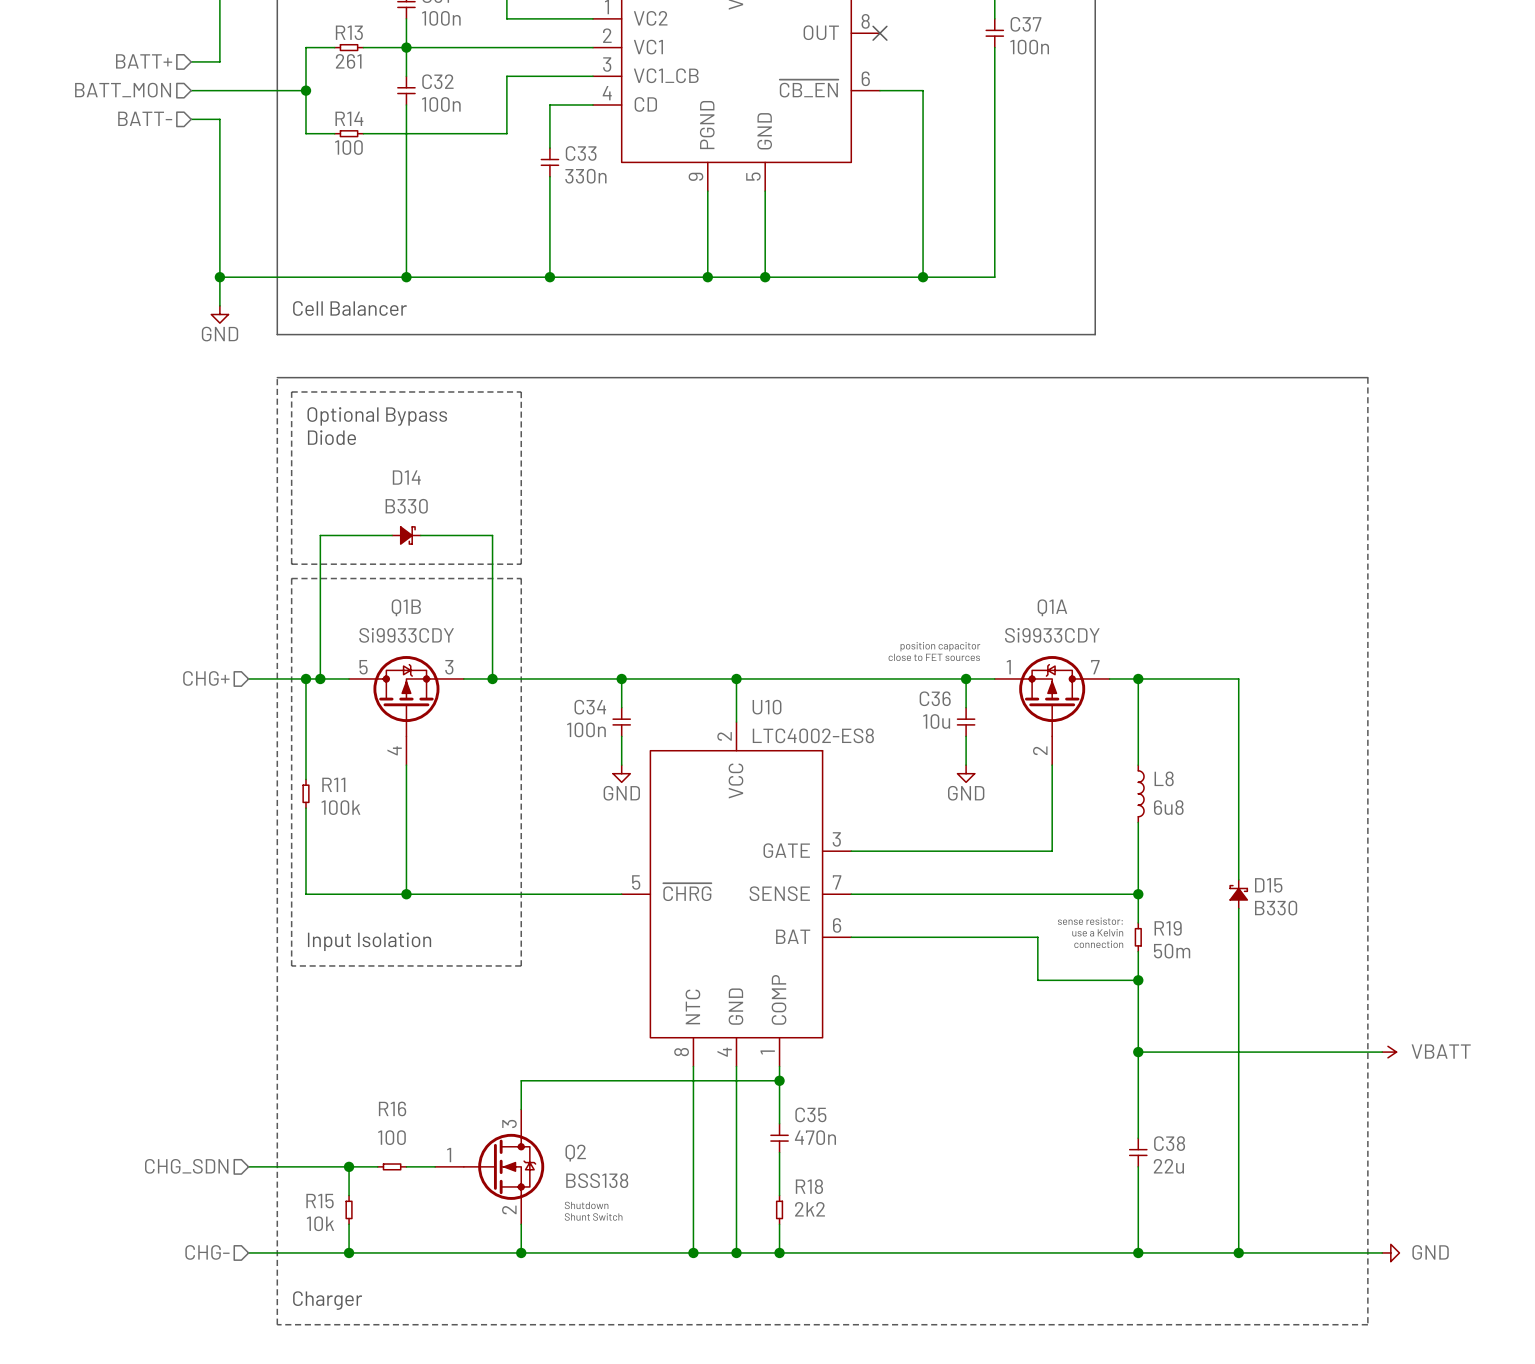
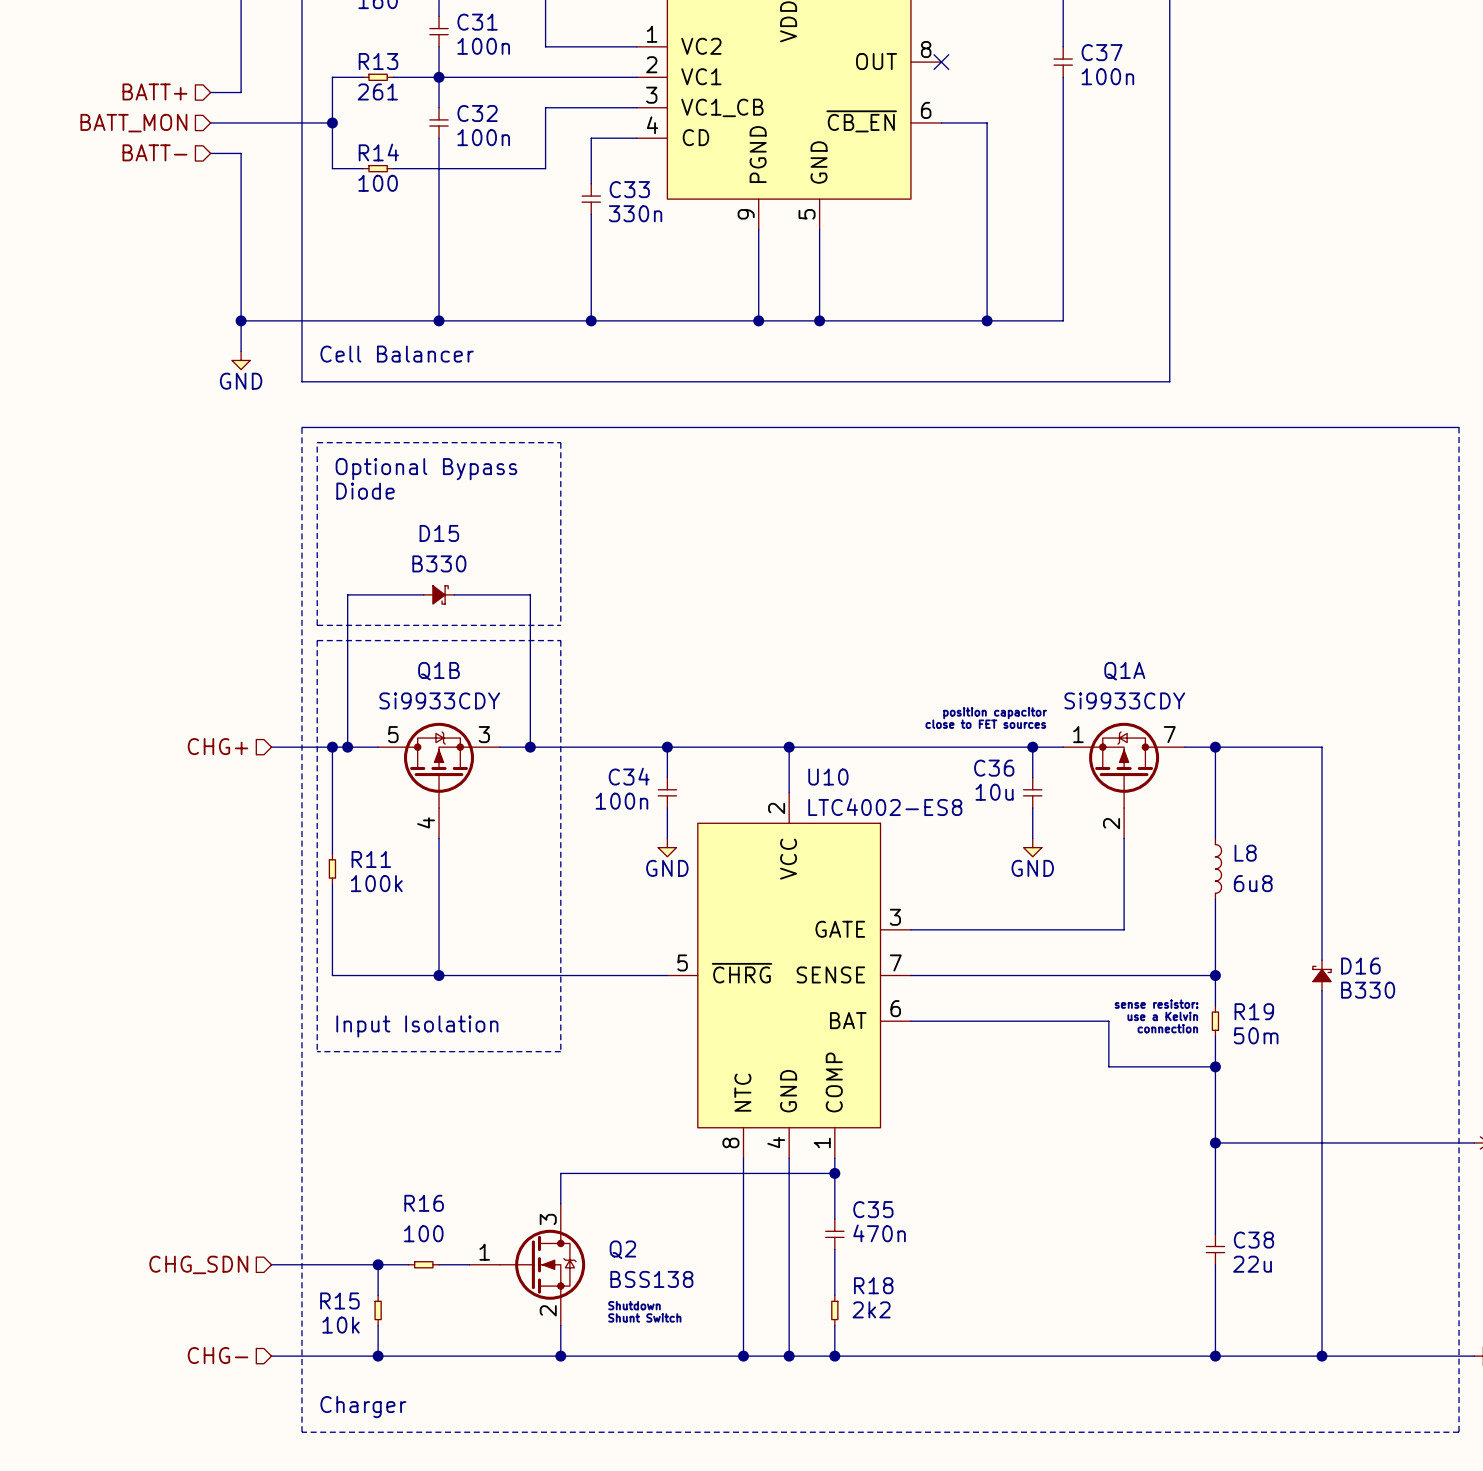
D14 name: D14 (406, 477) -> D15 (439, 533)
D15 name: D15 (1268, 885) -> D16 (1360, 966)

